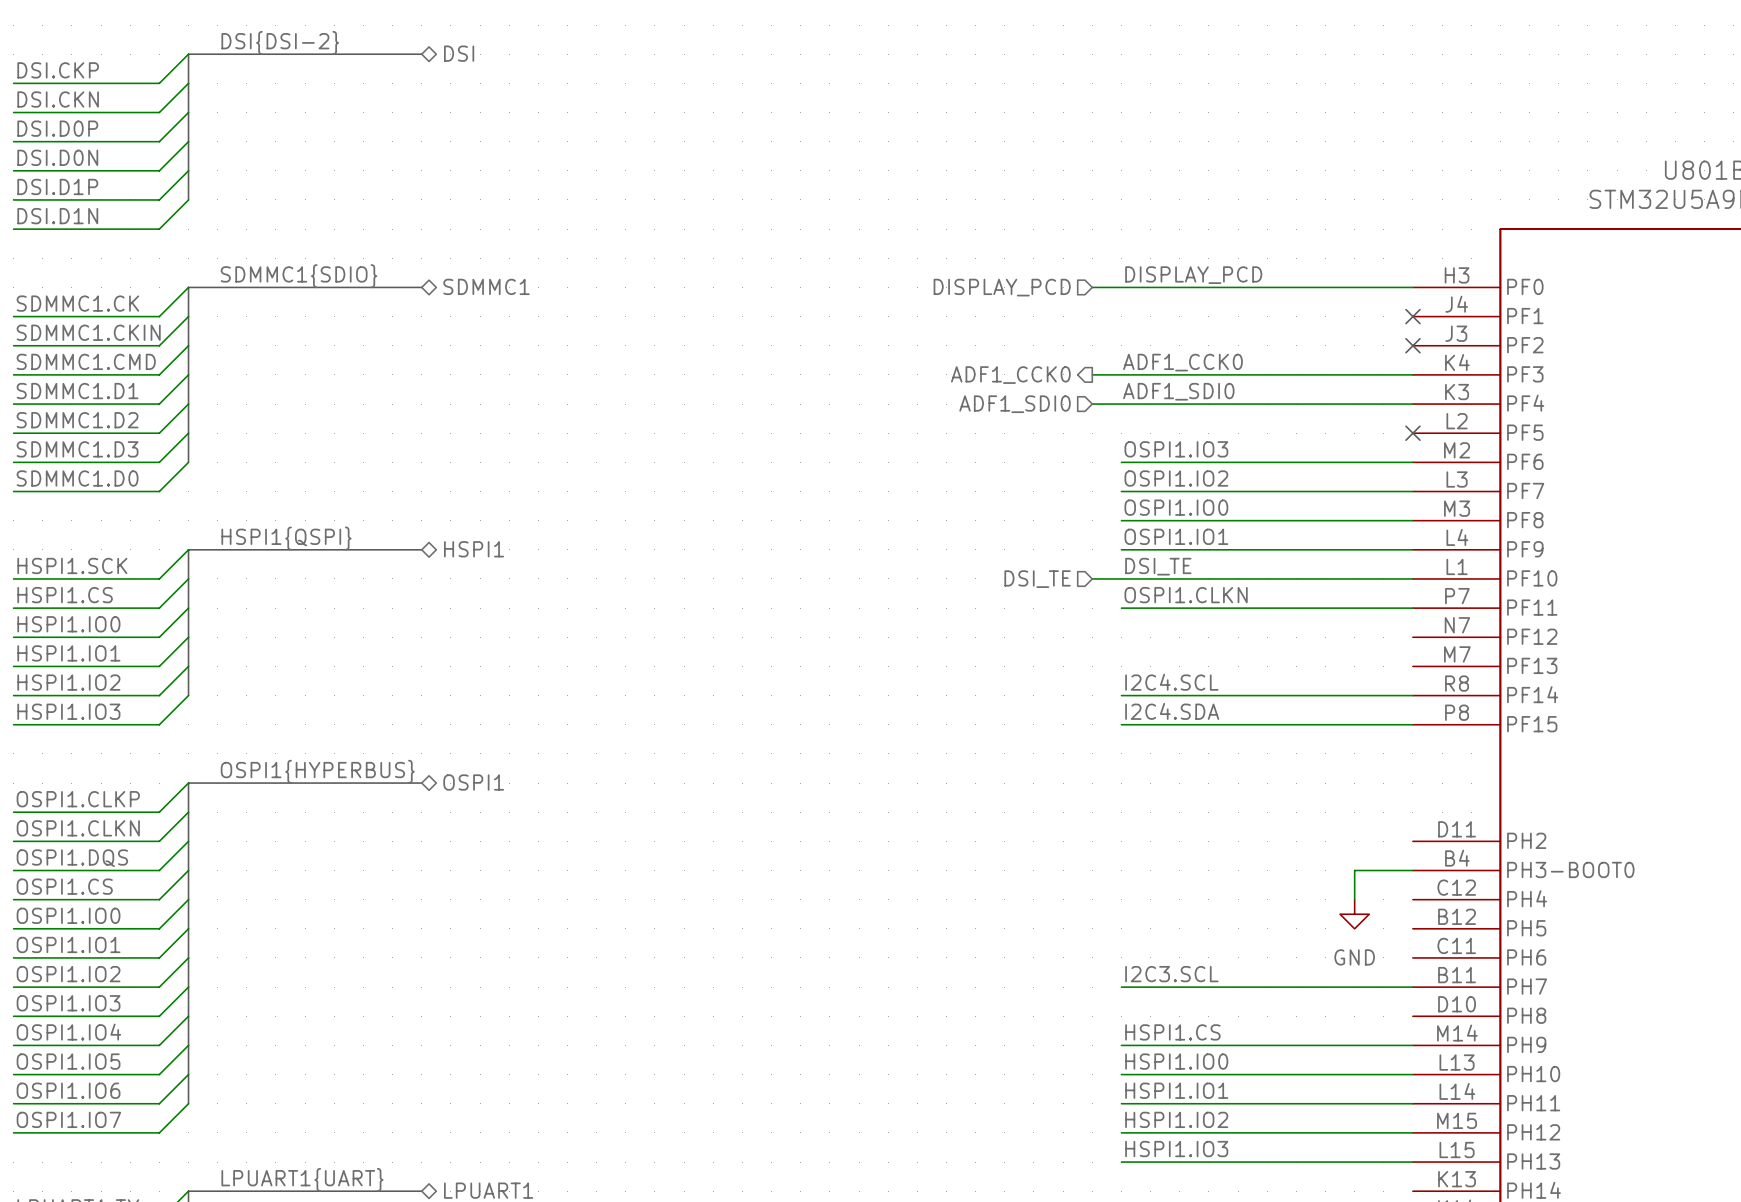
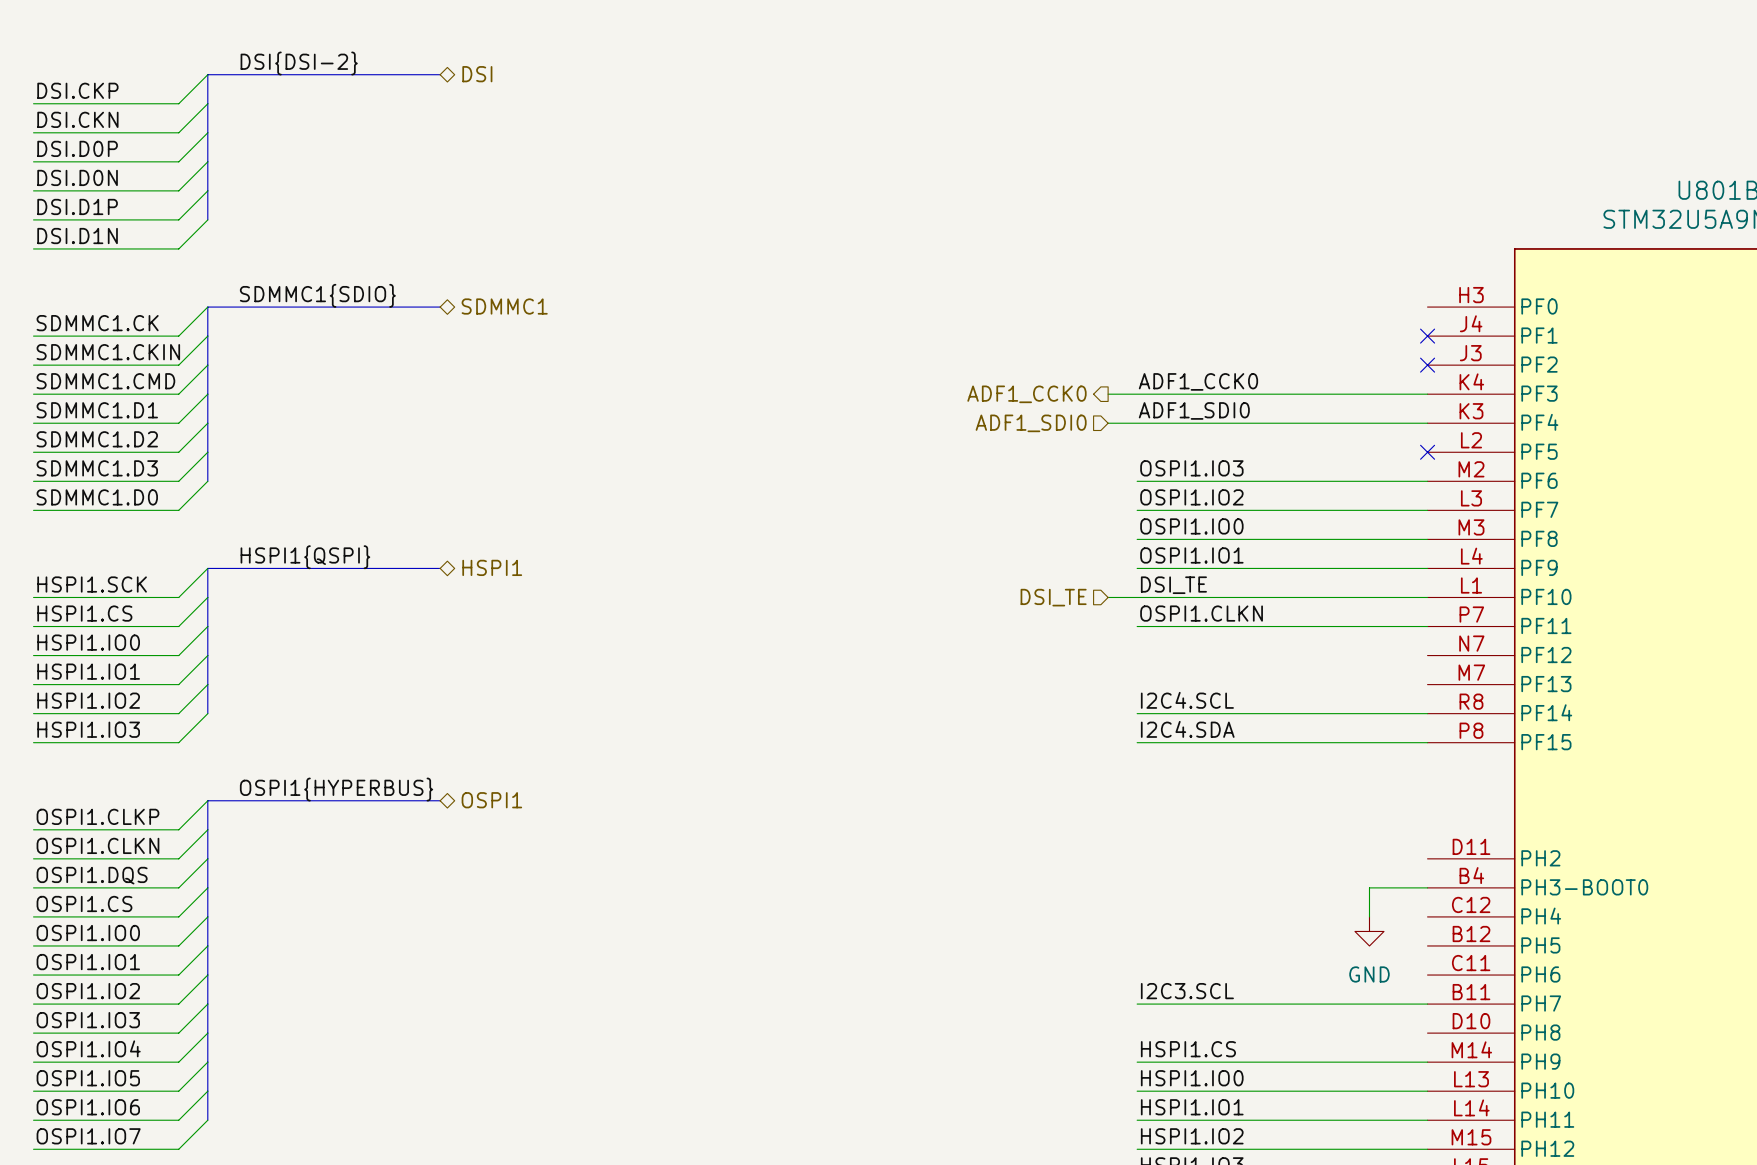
label: DISPLAY_PCD (1193, 275) -> none
hierarchical label: DISPLAY_PCD (1002, 287) -> none
wire: (1092, 287) (1412, 287) -> none

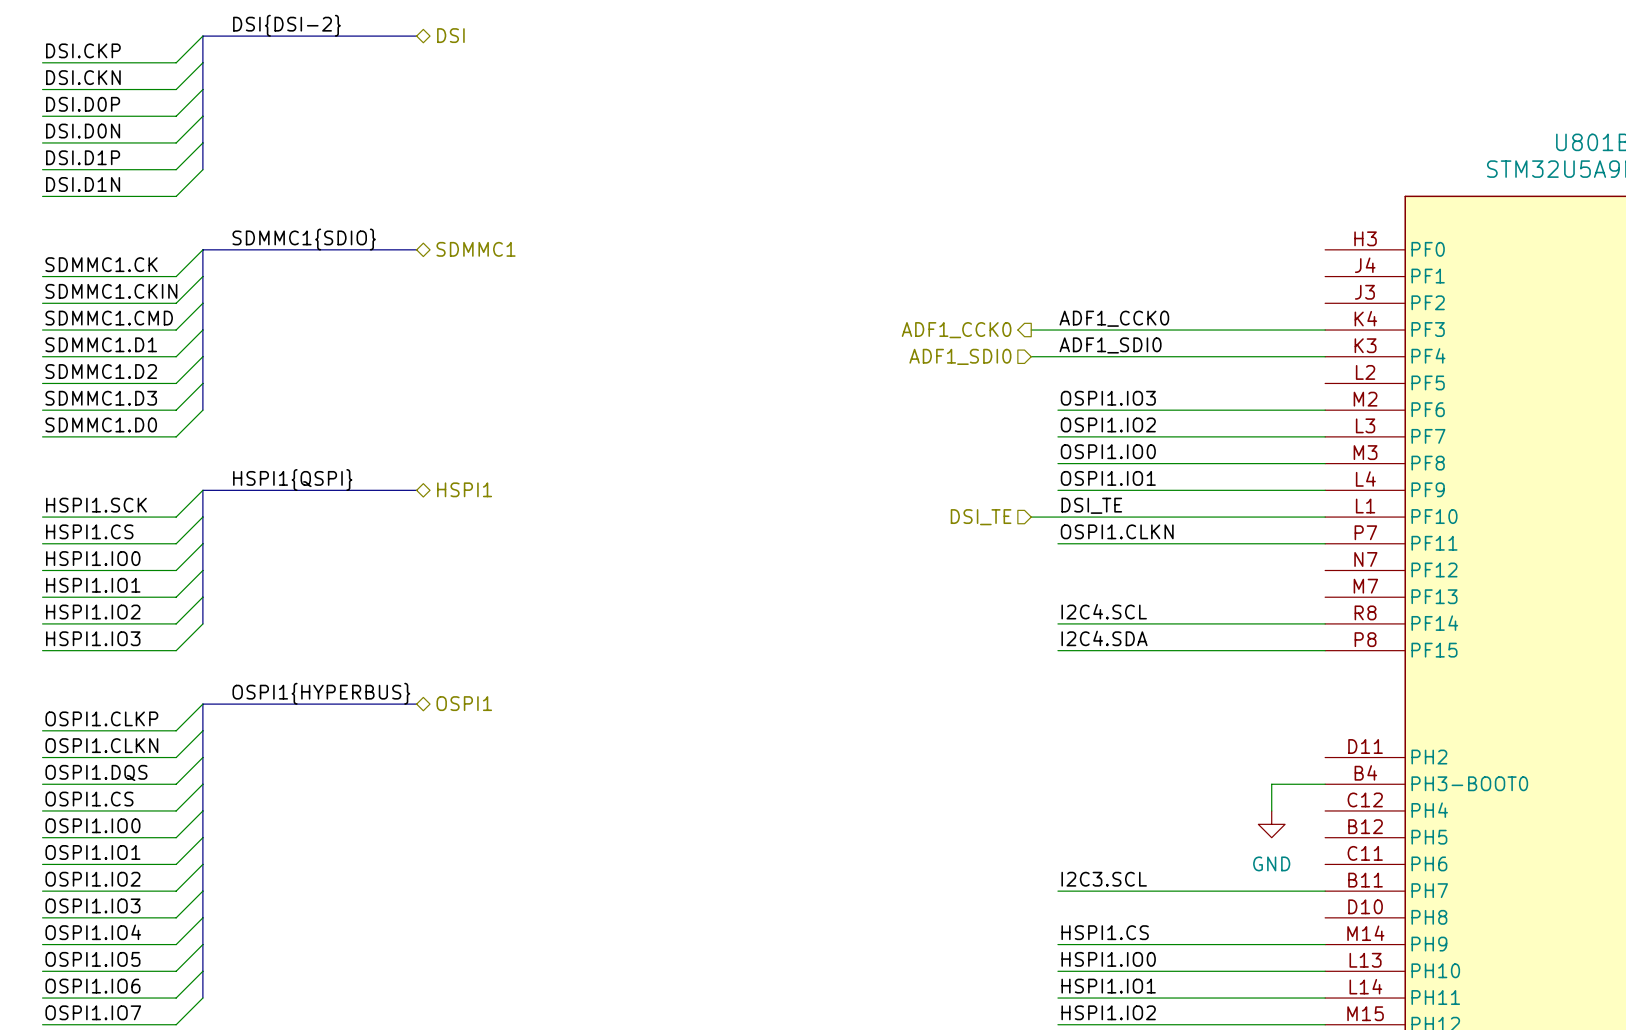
no-connect mark: (1427, 336) -> none
no-connect mark: (1427, 365) -> none
no-connect mark: (1427, 452) -> none

